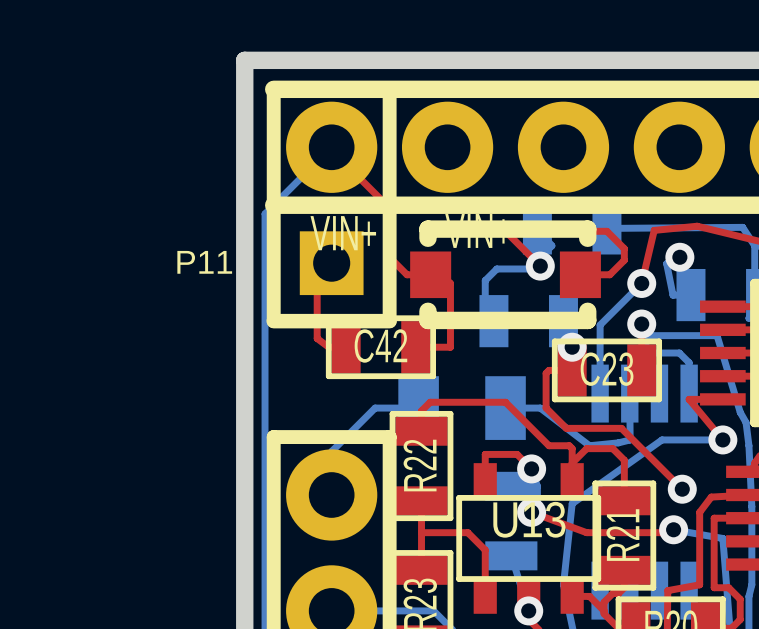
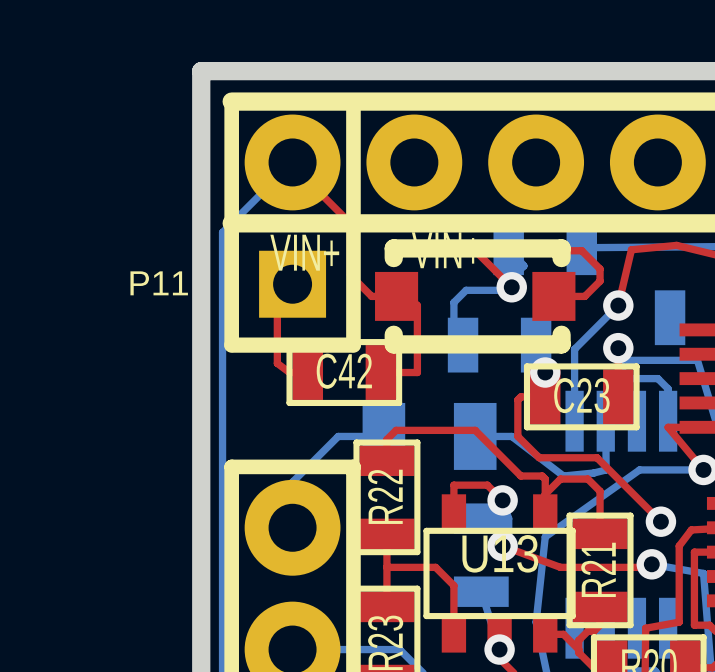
bottom track: (679, 257) (666, 263) (673, 295) (690, 295) -> none
via: (679, 257) -> none

